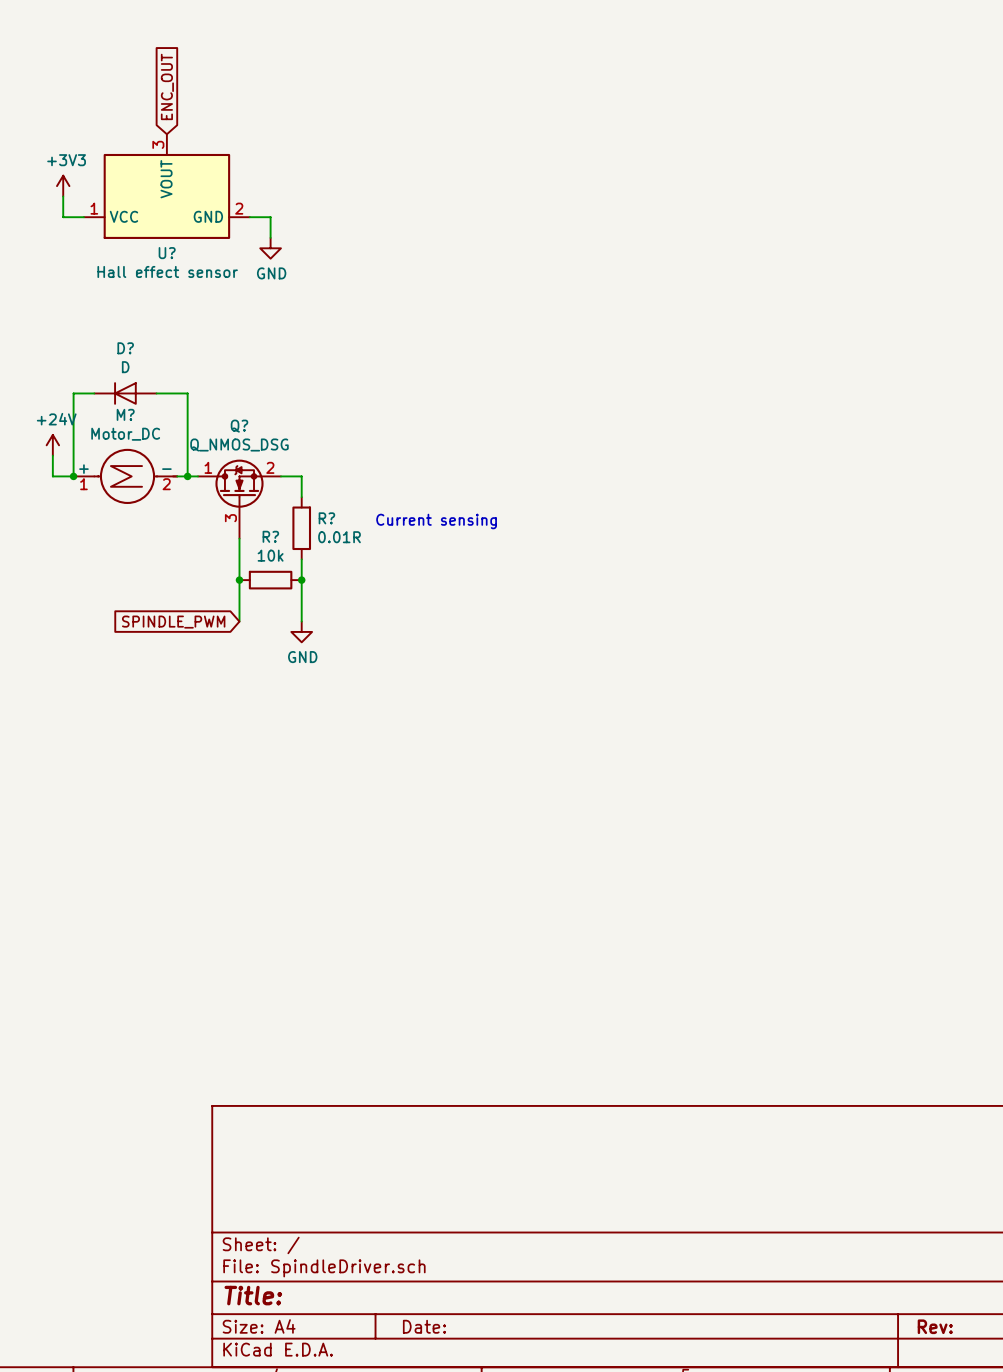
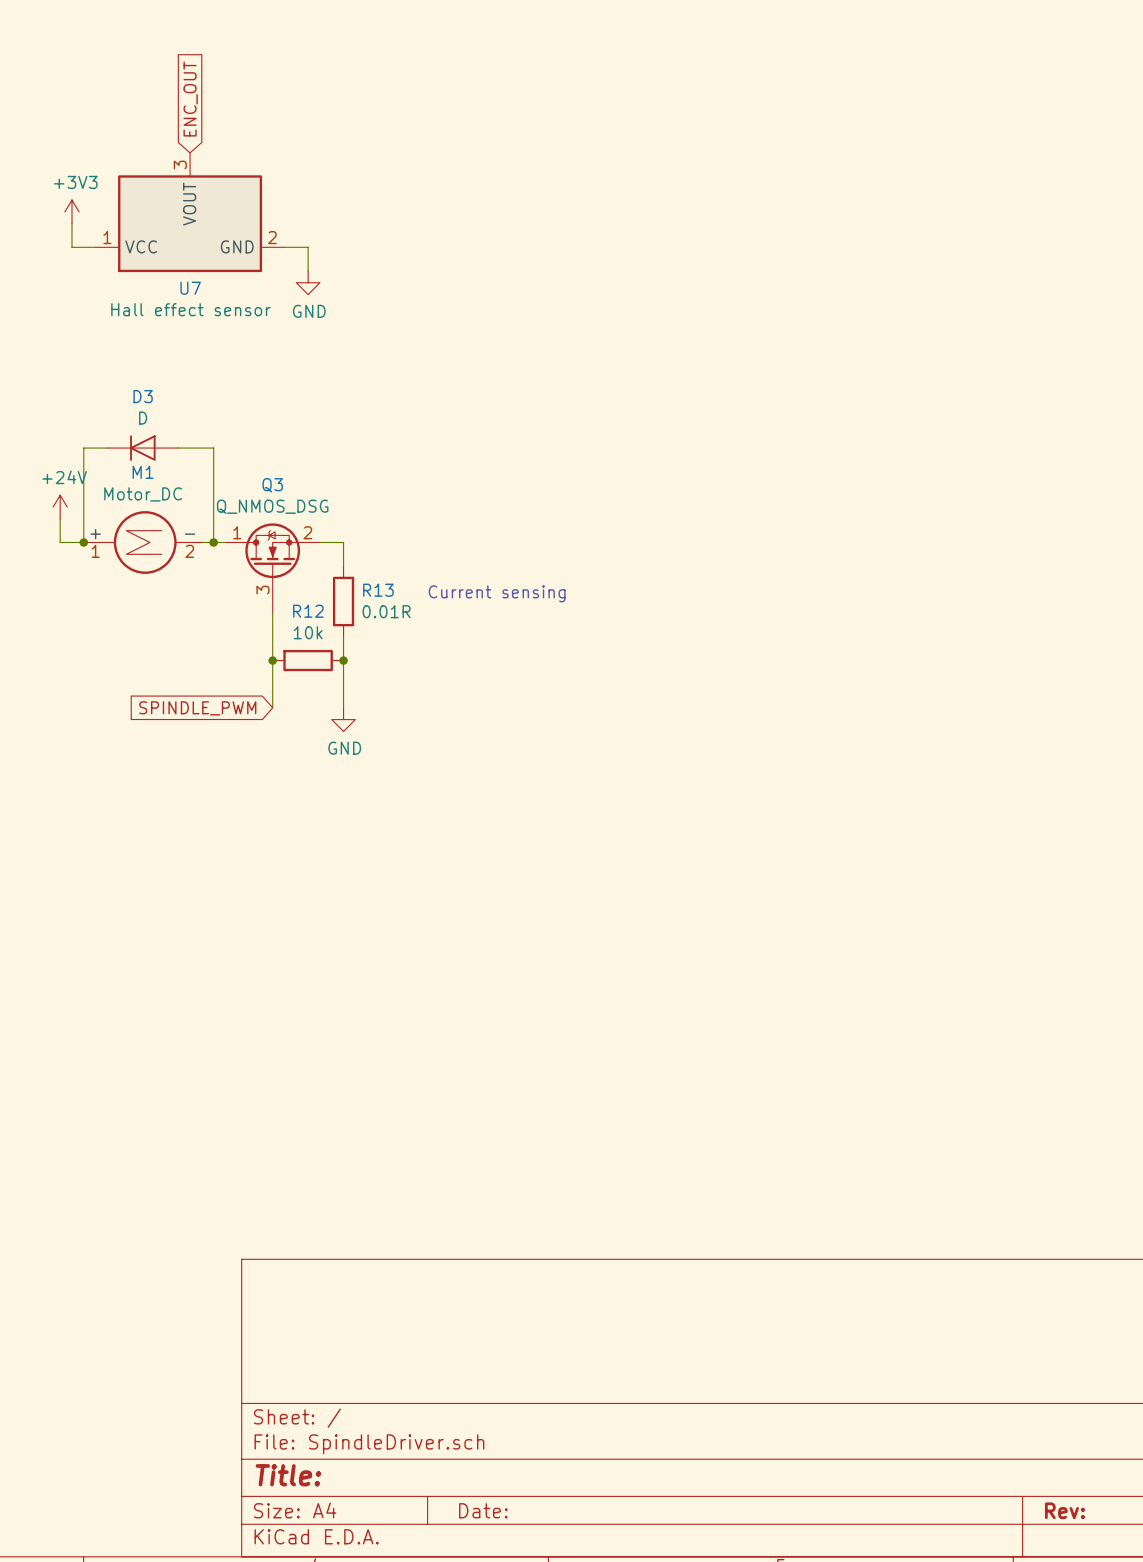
U? name: U? (167, 253) -> U7 (190, 288)
D? name: D? (125, 348) -> D3 (143, 396)
M? name: M? (125, 414) -> M1 (143, 472)
Q? name: Q? (239, 426) -> Q3 (272, 485)
R? name: R? (326, 518) -> R13 (378, 590)
R? name: R? (270, 536) -> R12 (308, 611)

